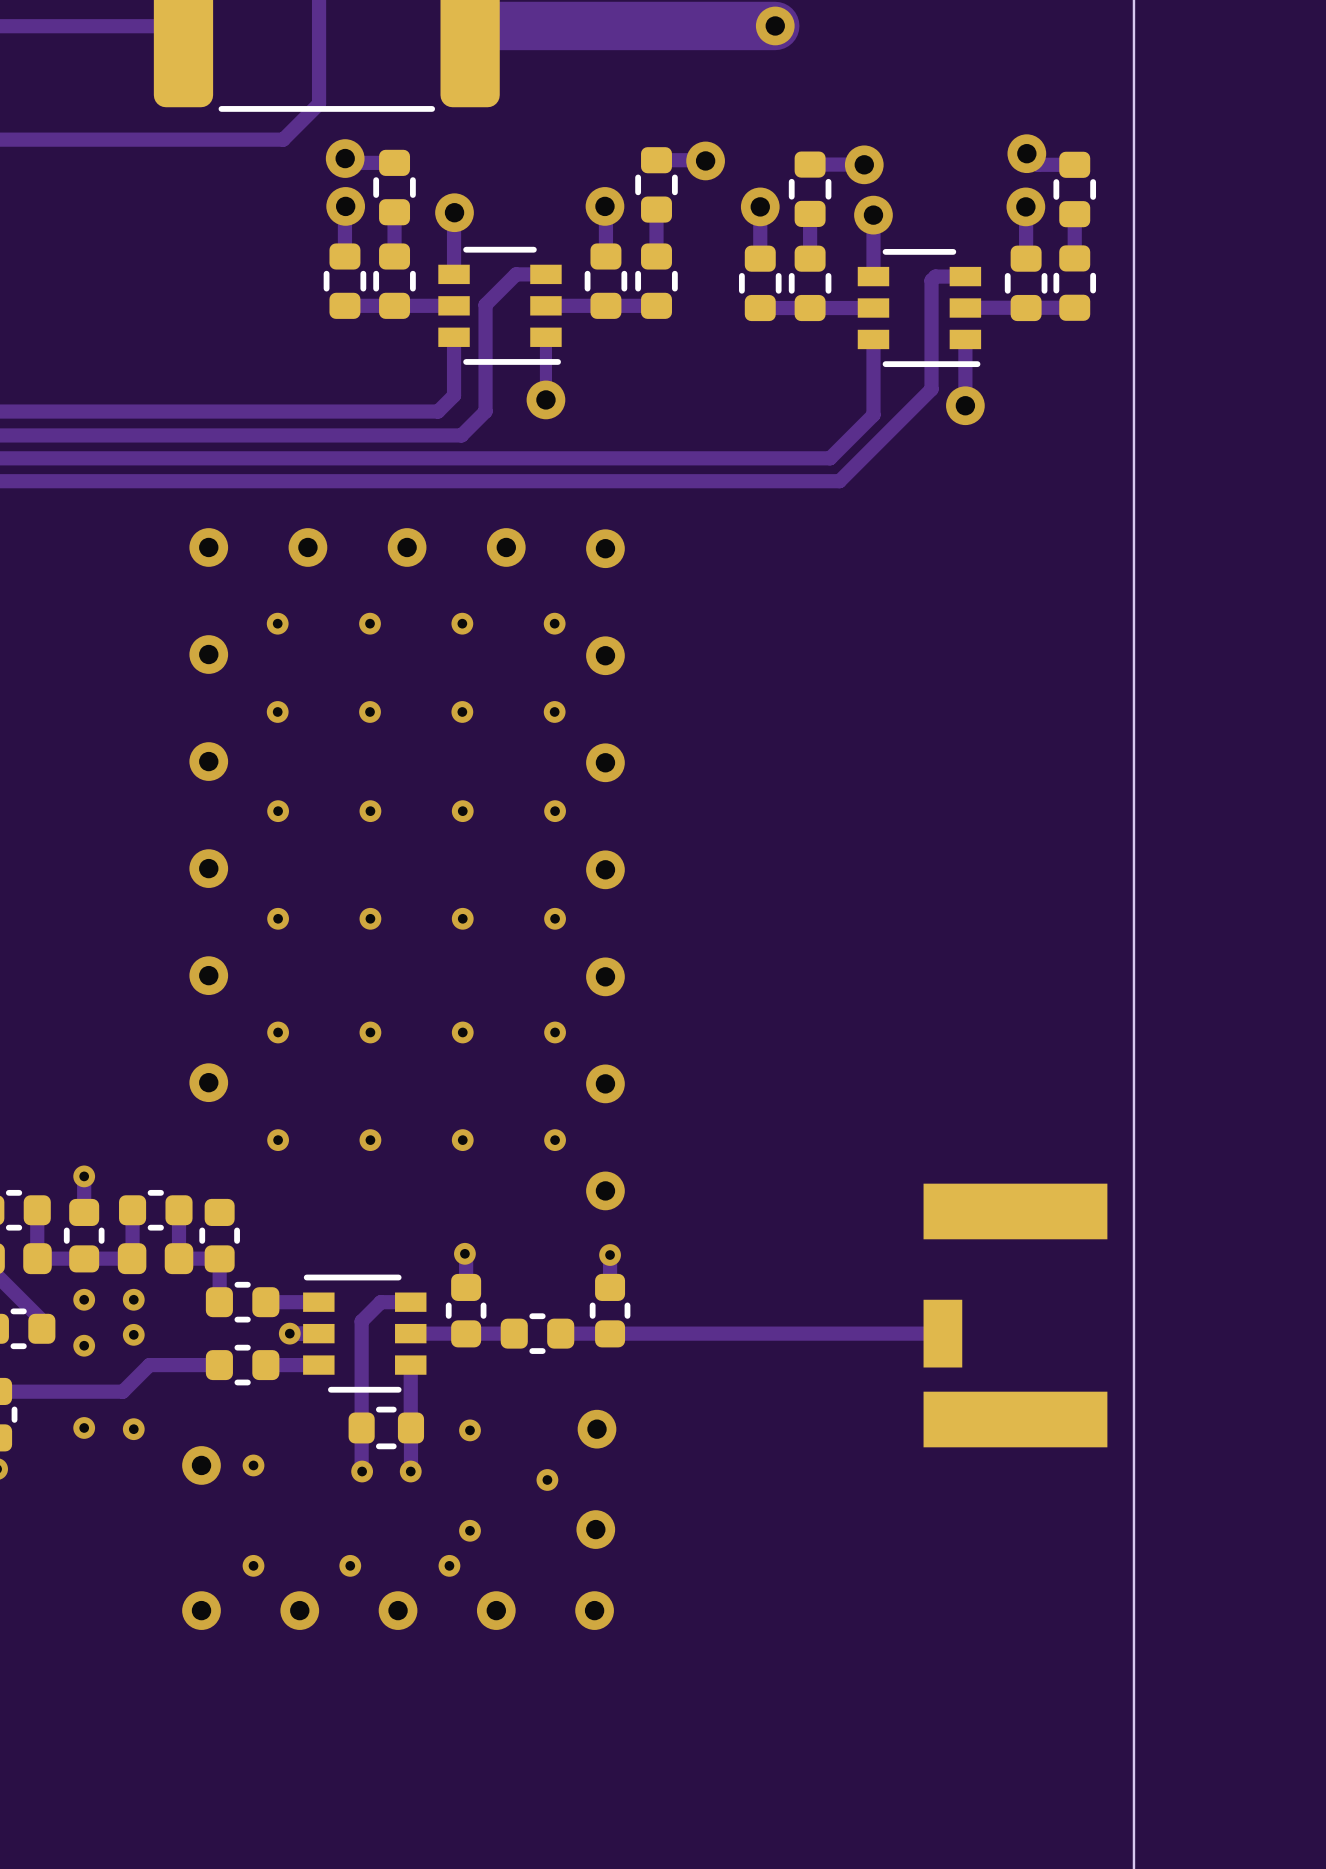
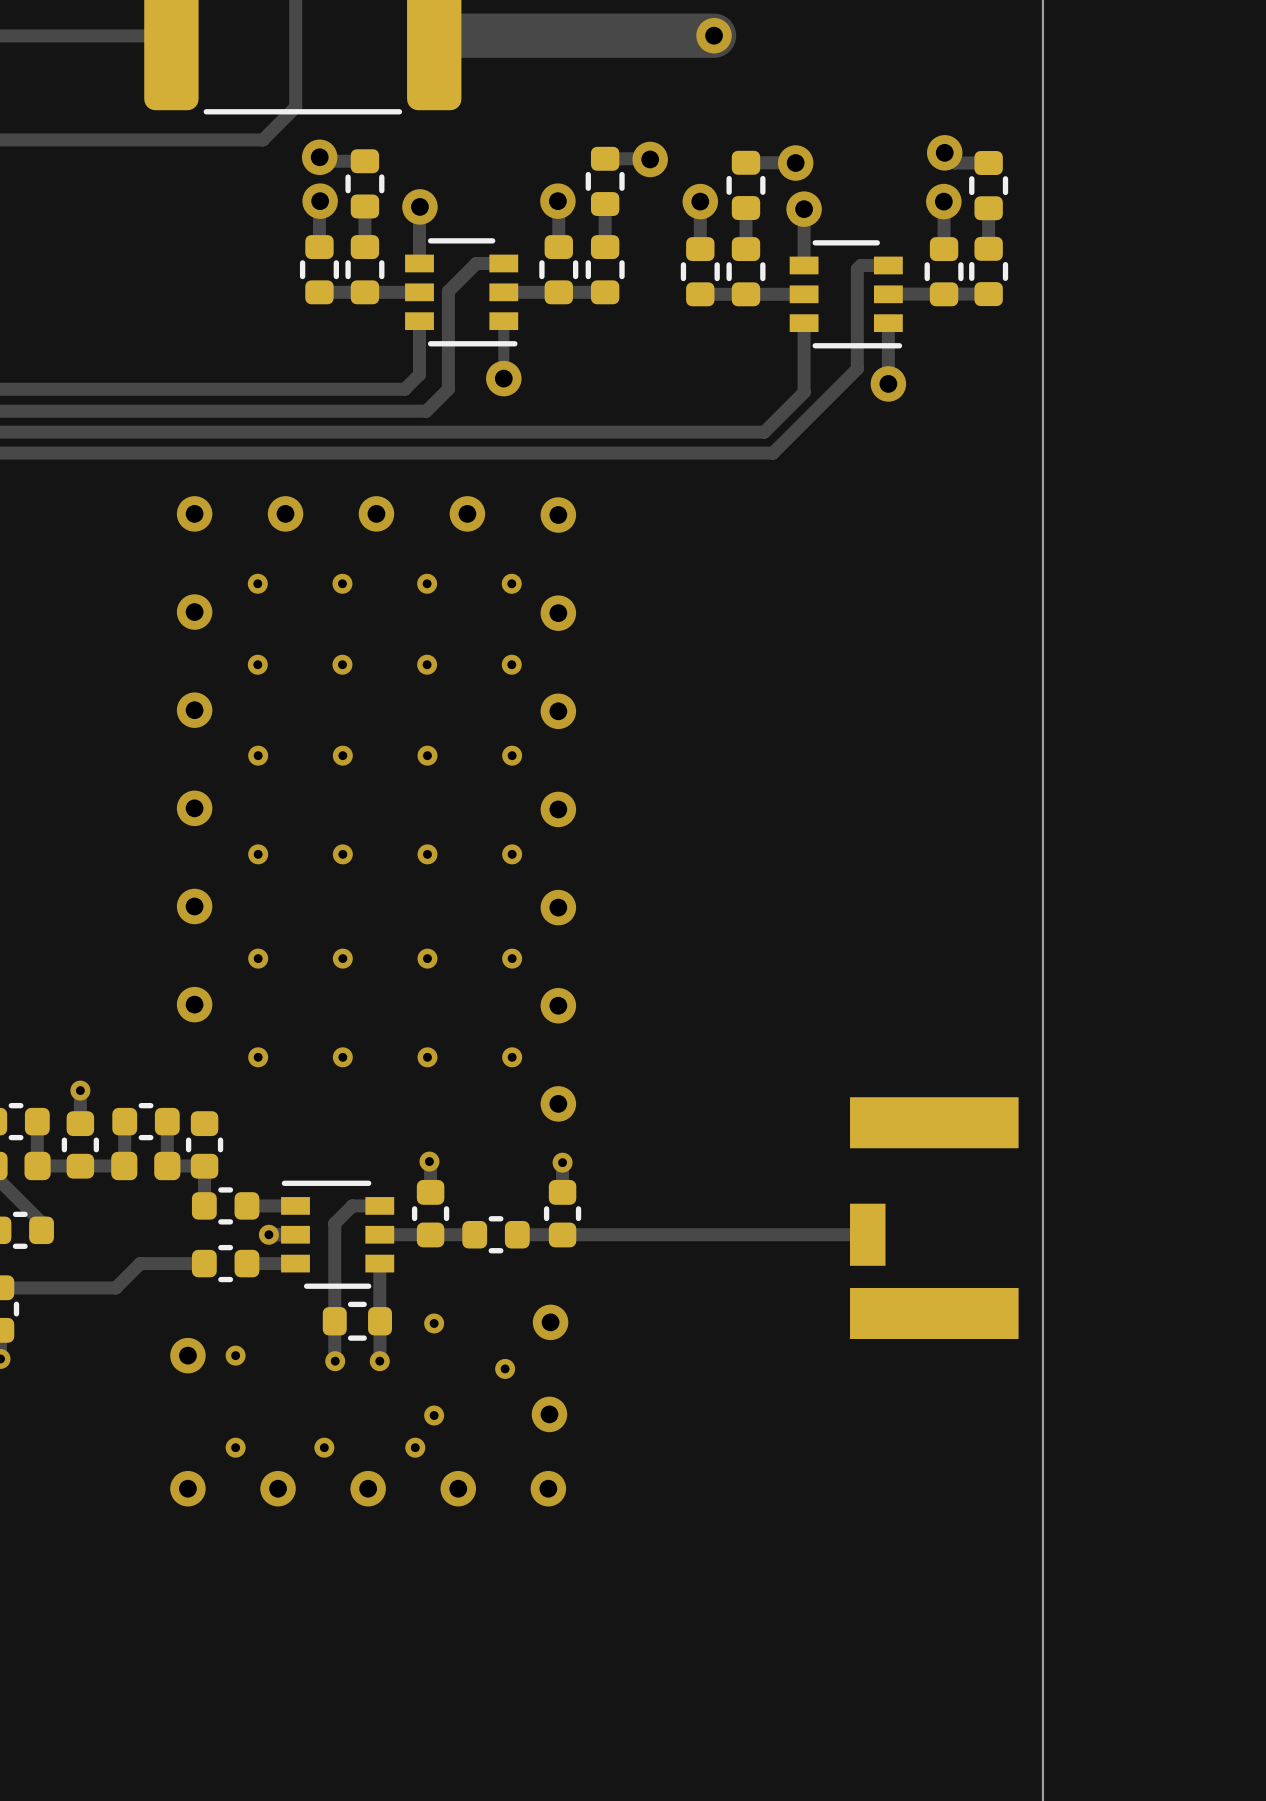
via: (84, 1299) -> none
via: (133, 1299) -> none
via: (133, 1334) -> none
via: (84, 1345) -> none
via: (84, 1427) -> none
via: (133, 1429) -> none

